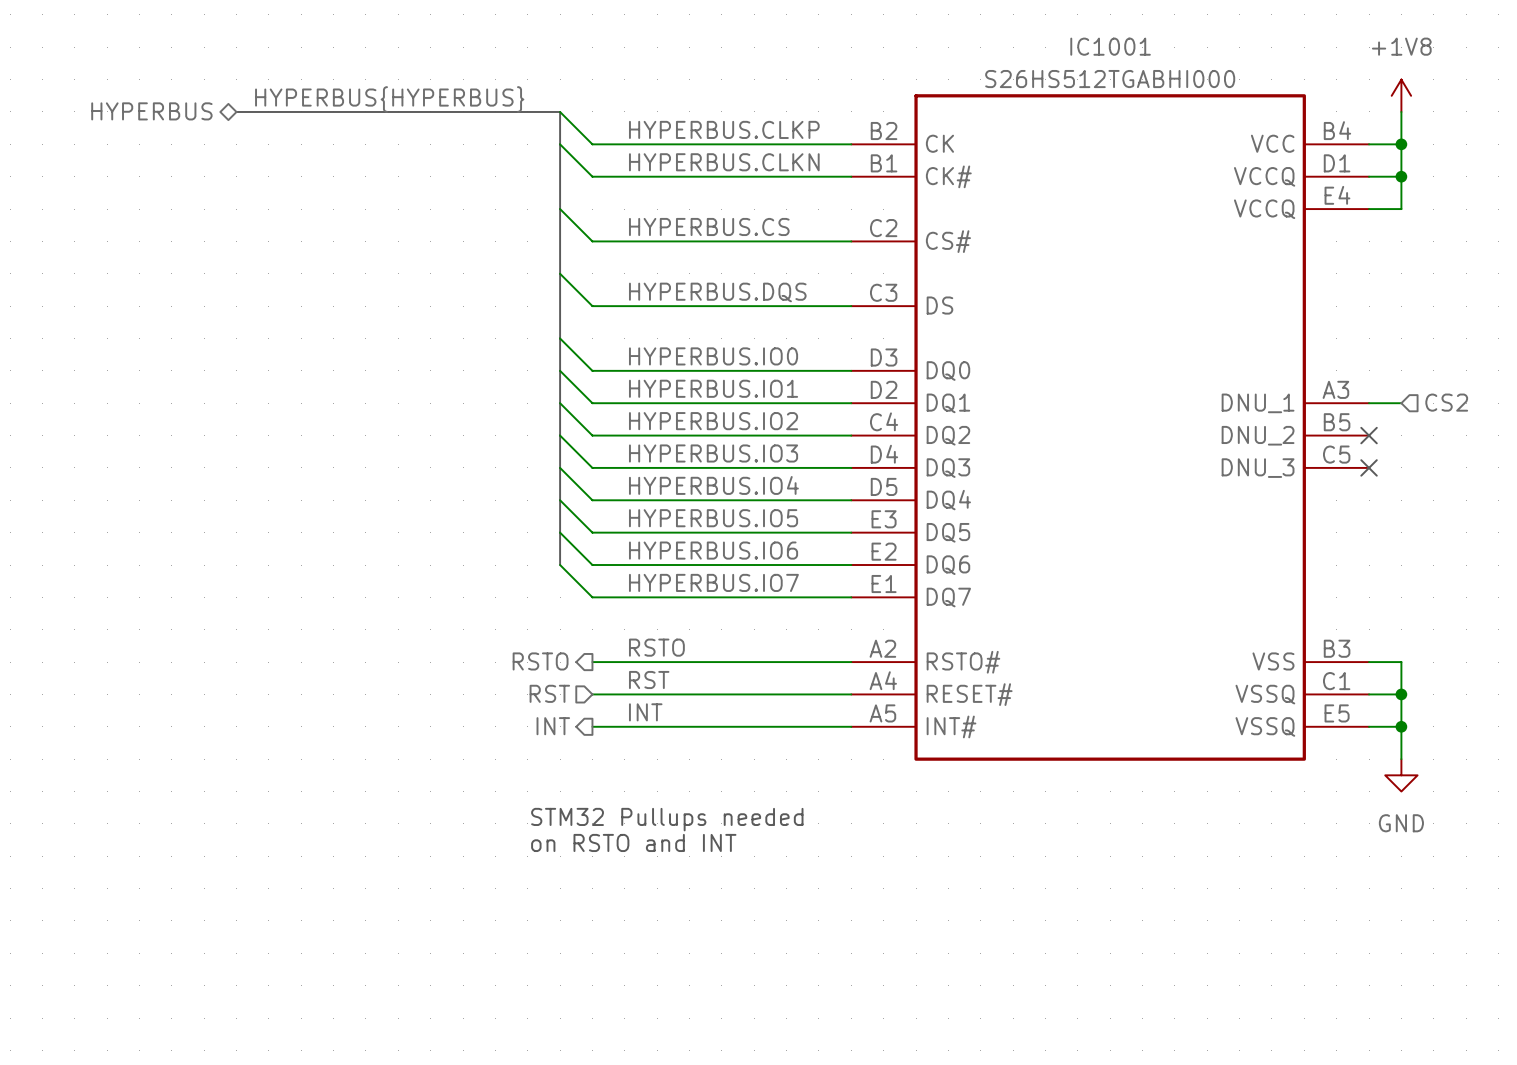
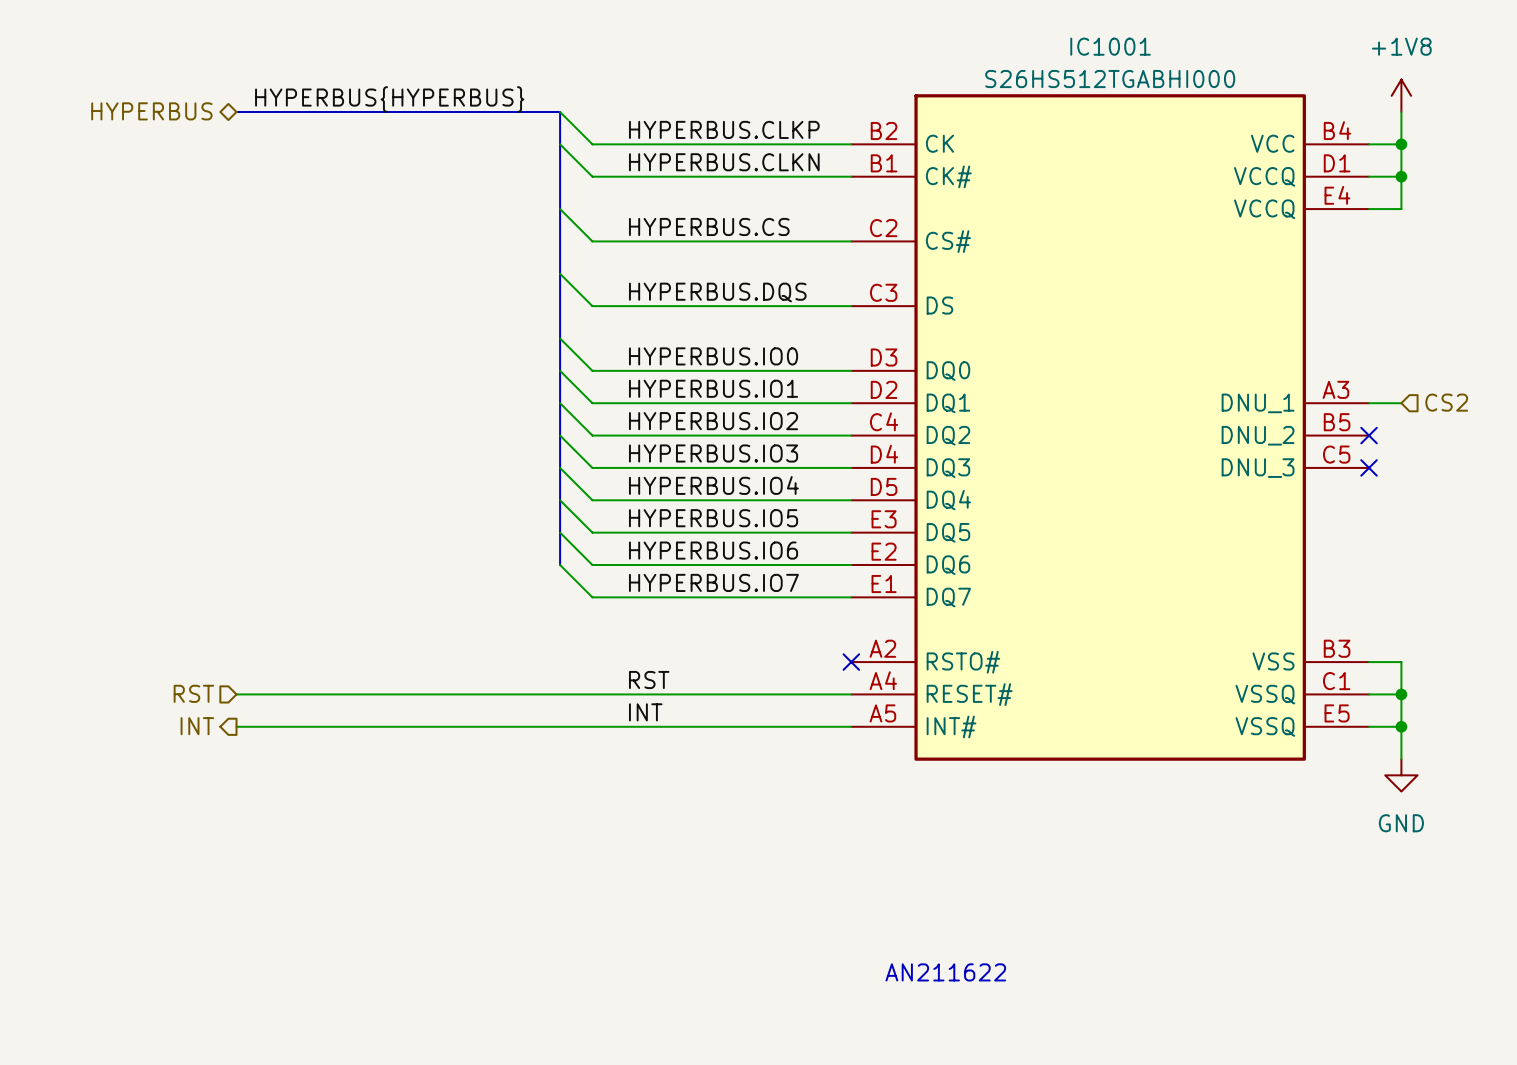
label: RSTO (656, 647) -> none
hierarchical label: RSTO (540, 661) -> none
wire: (592, 662) (851, 662) -> none
no-connect mark: none -> (851, 662)
hierarchical label: none -> RST (193, 693)
hierarchical label: RST (549, 693) -> none
wire: none -> (236, 694) (592, 694)
hierarchical label: none -> INT (197, 726)
wire: none -> (236, 726) (592, 726)
hierarchical label: INT (553, 726) -> none
text: STM32 Pullups needed (667, 819) -> none
text: on RSTO and INT (633, 842) -> none
text: none -> AN211622 (945, 972)

